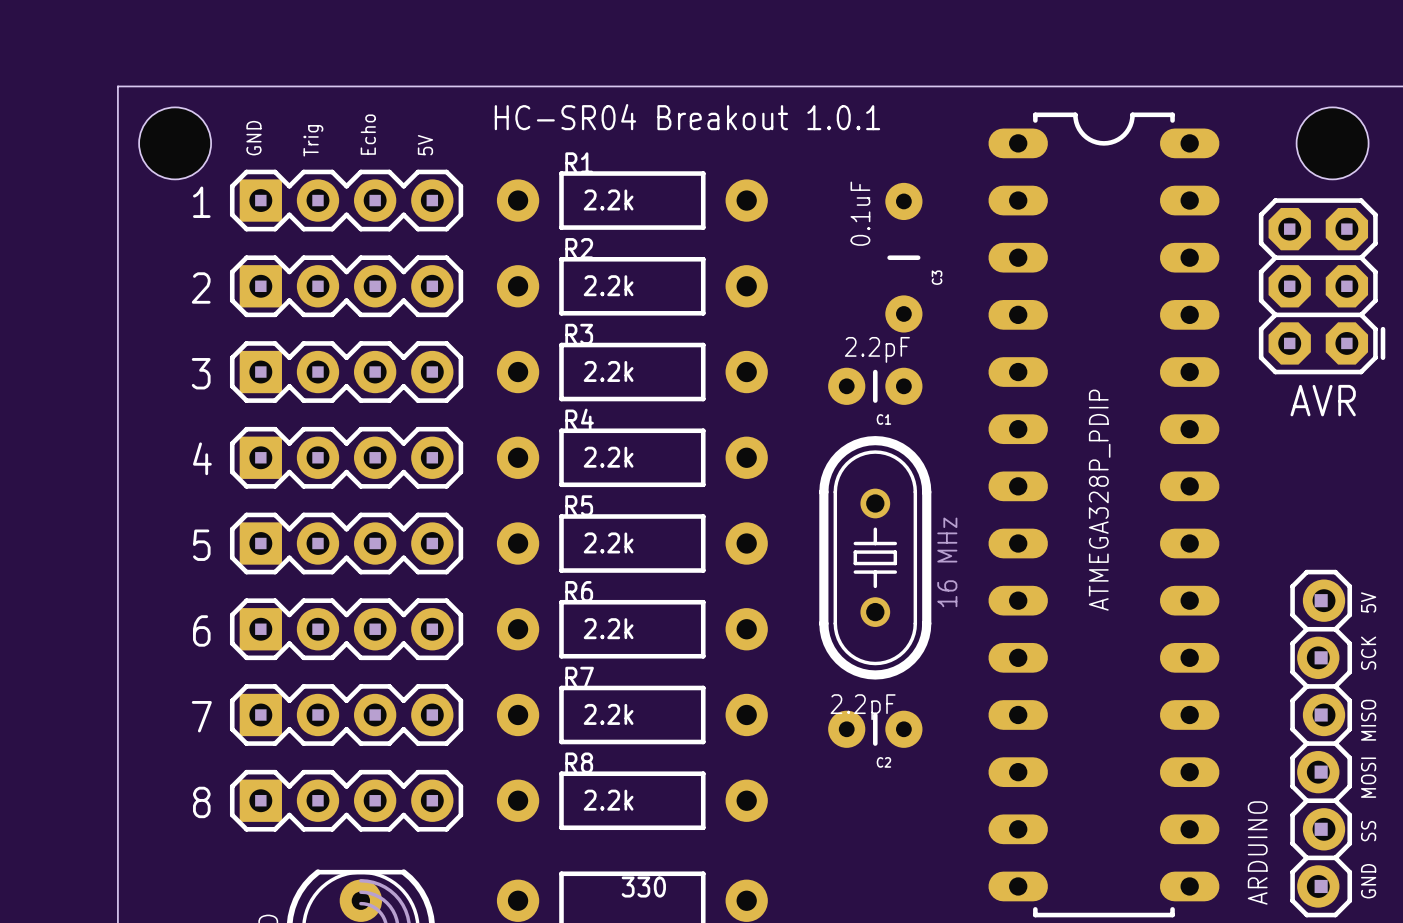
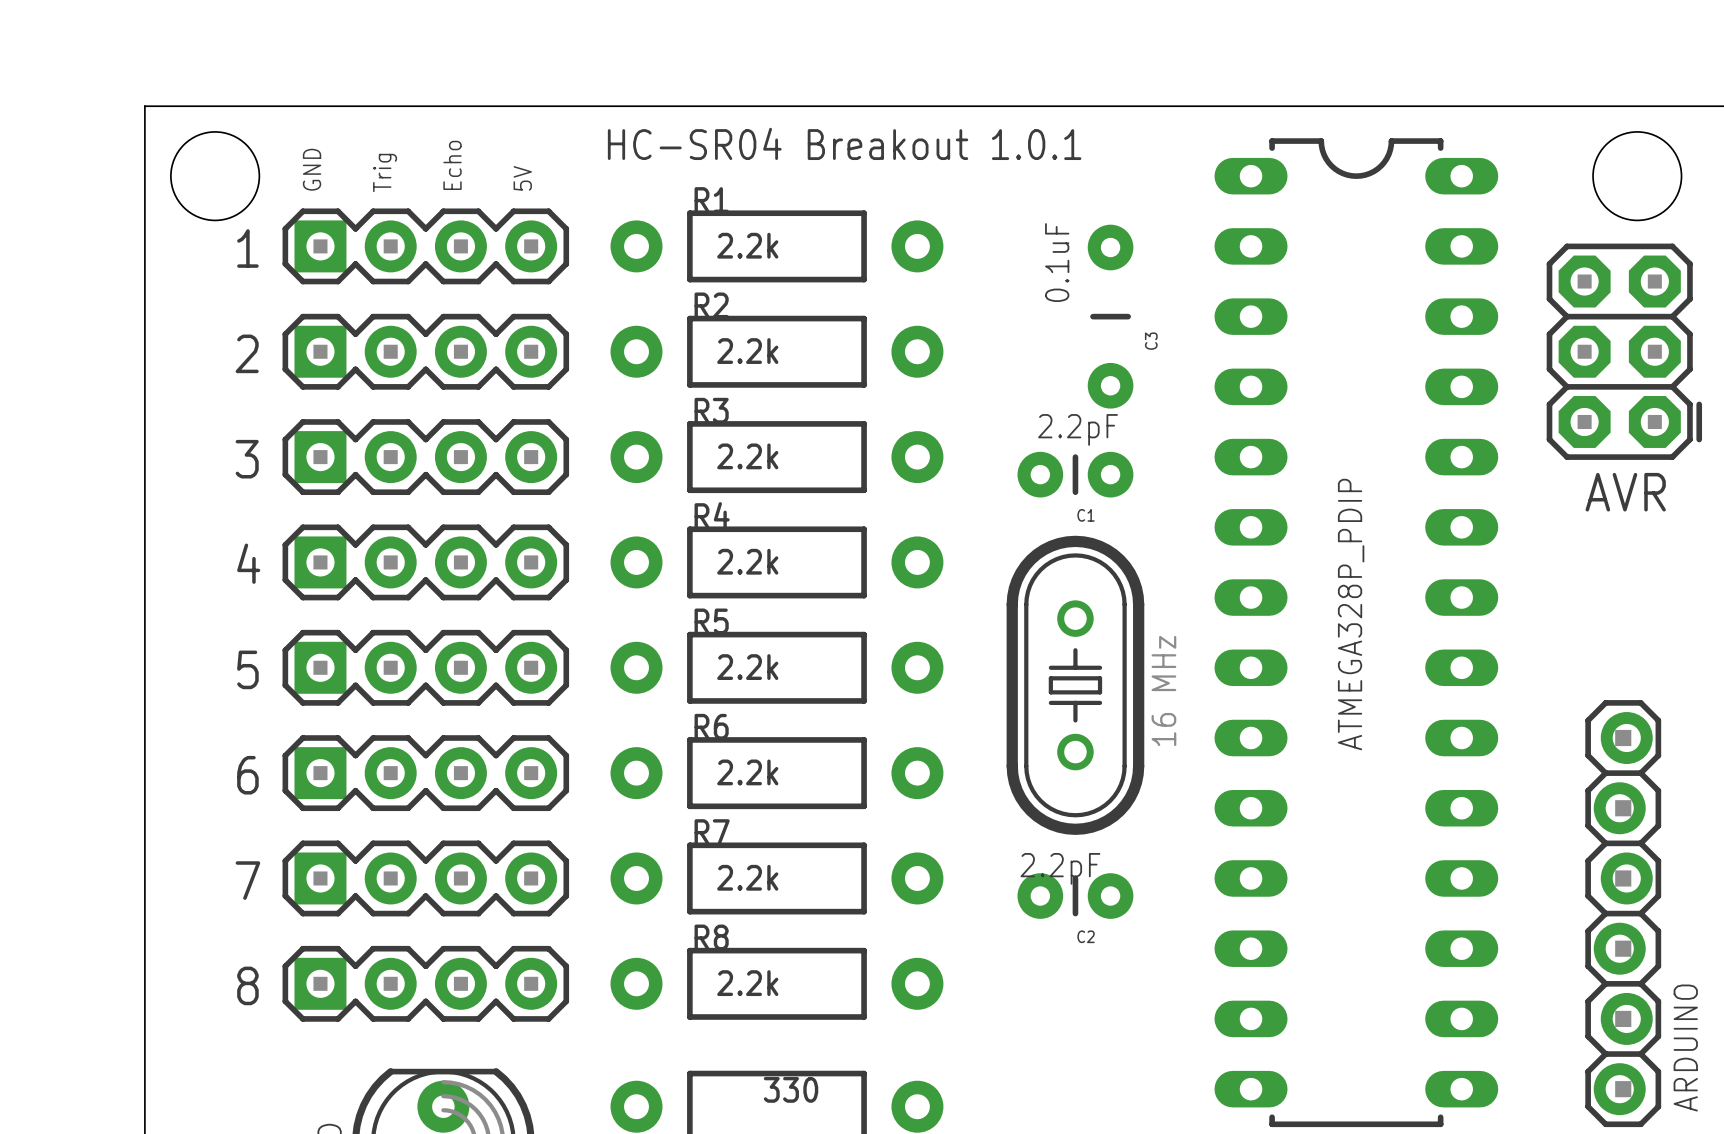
text: 5V (1368, 602) -> none
text: SCK (1368, 653) -> none
text: MISO (1368, 720) -> none
text: MOSI (1368, 777) -> none
text: SS (1368, 831) -> none
ARDUINO name position: ARDUINO (1257, 852) -> ARDUINO (1685, 1048)
text: GND (1368, 881) -> none

